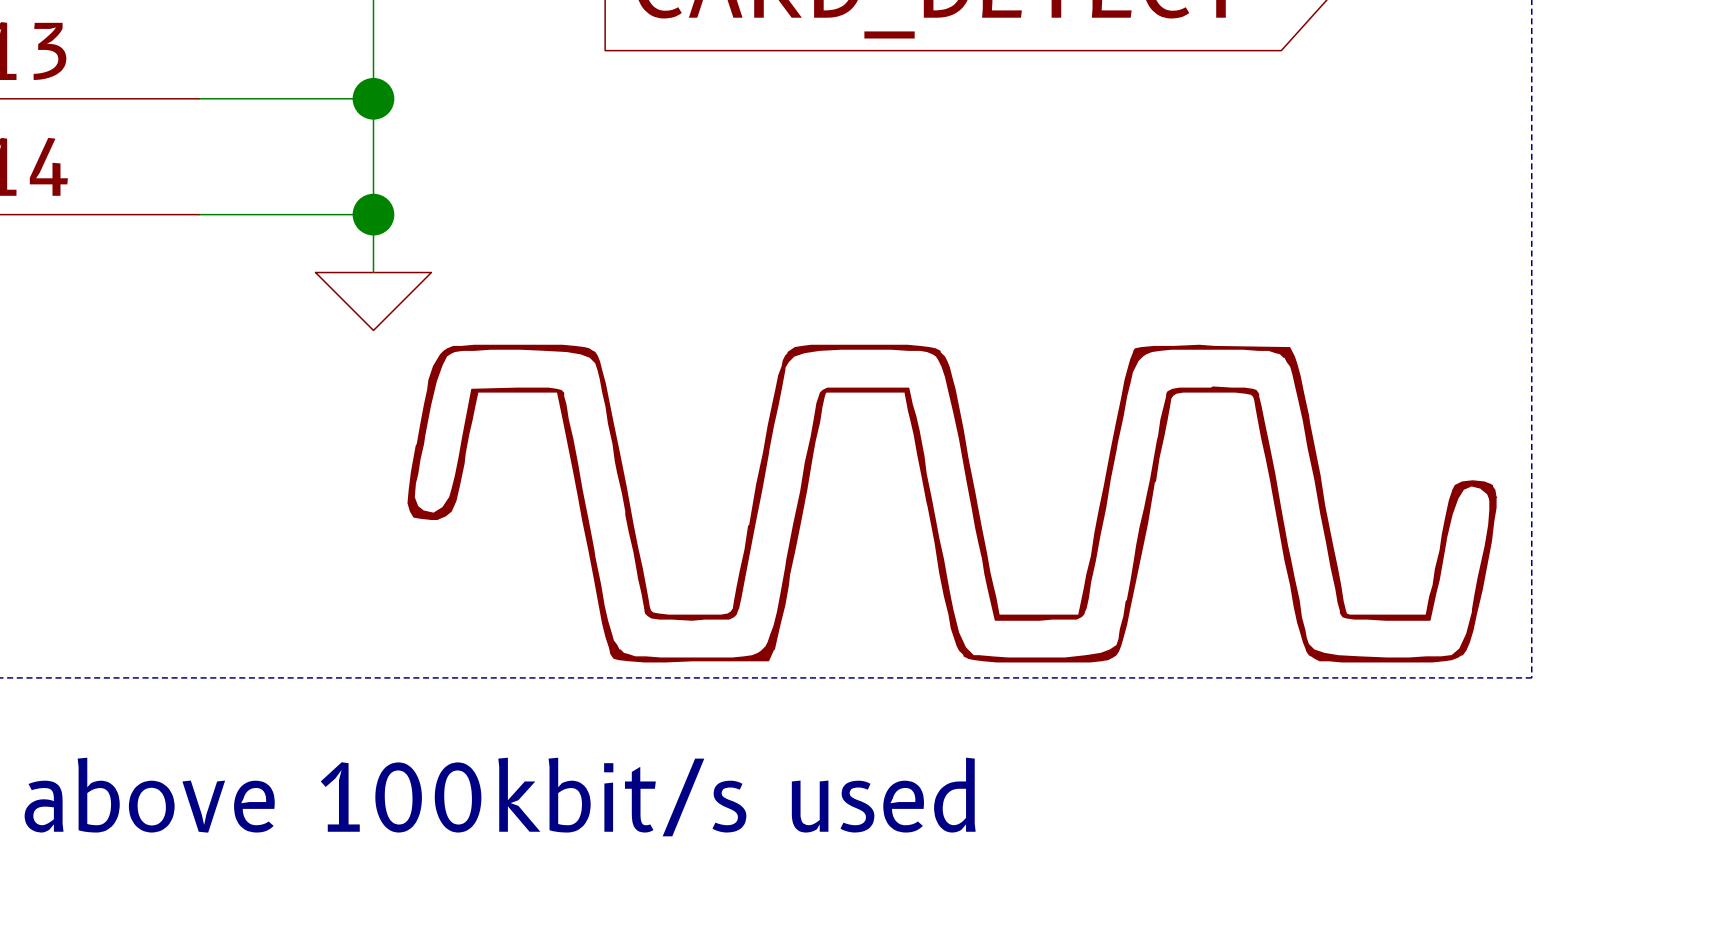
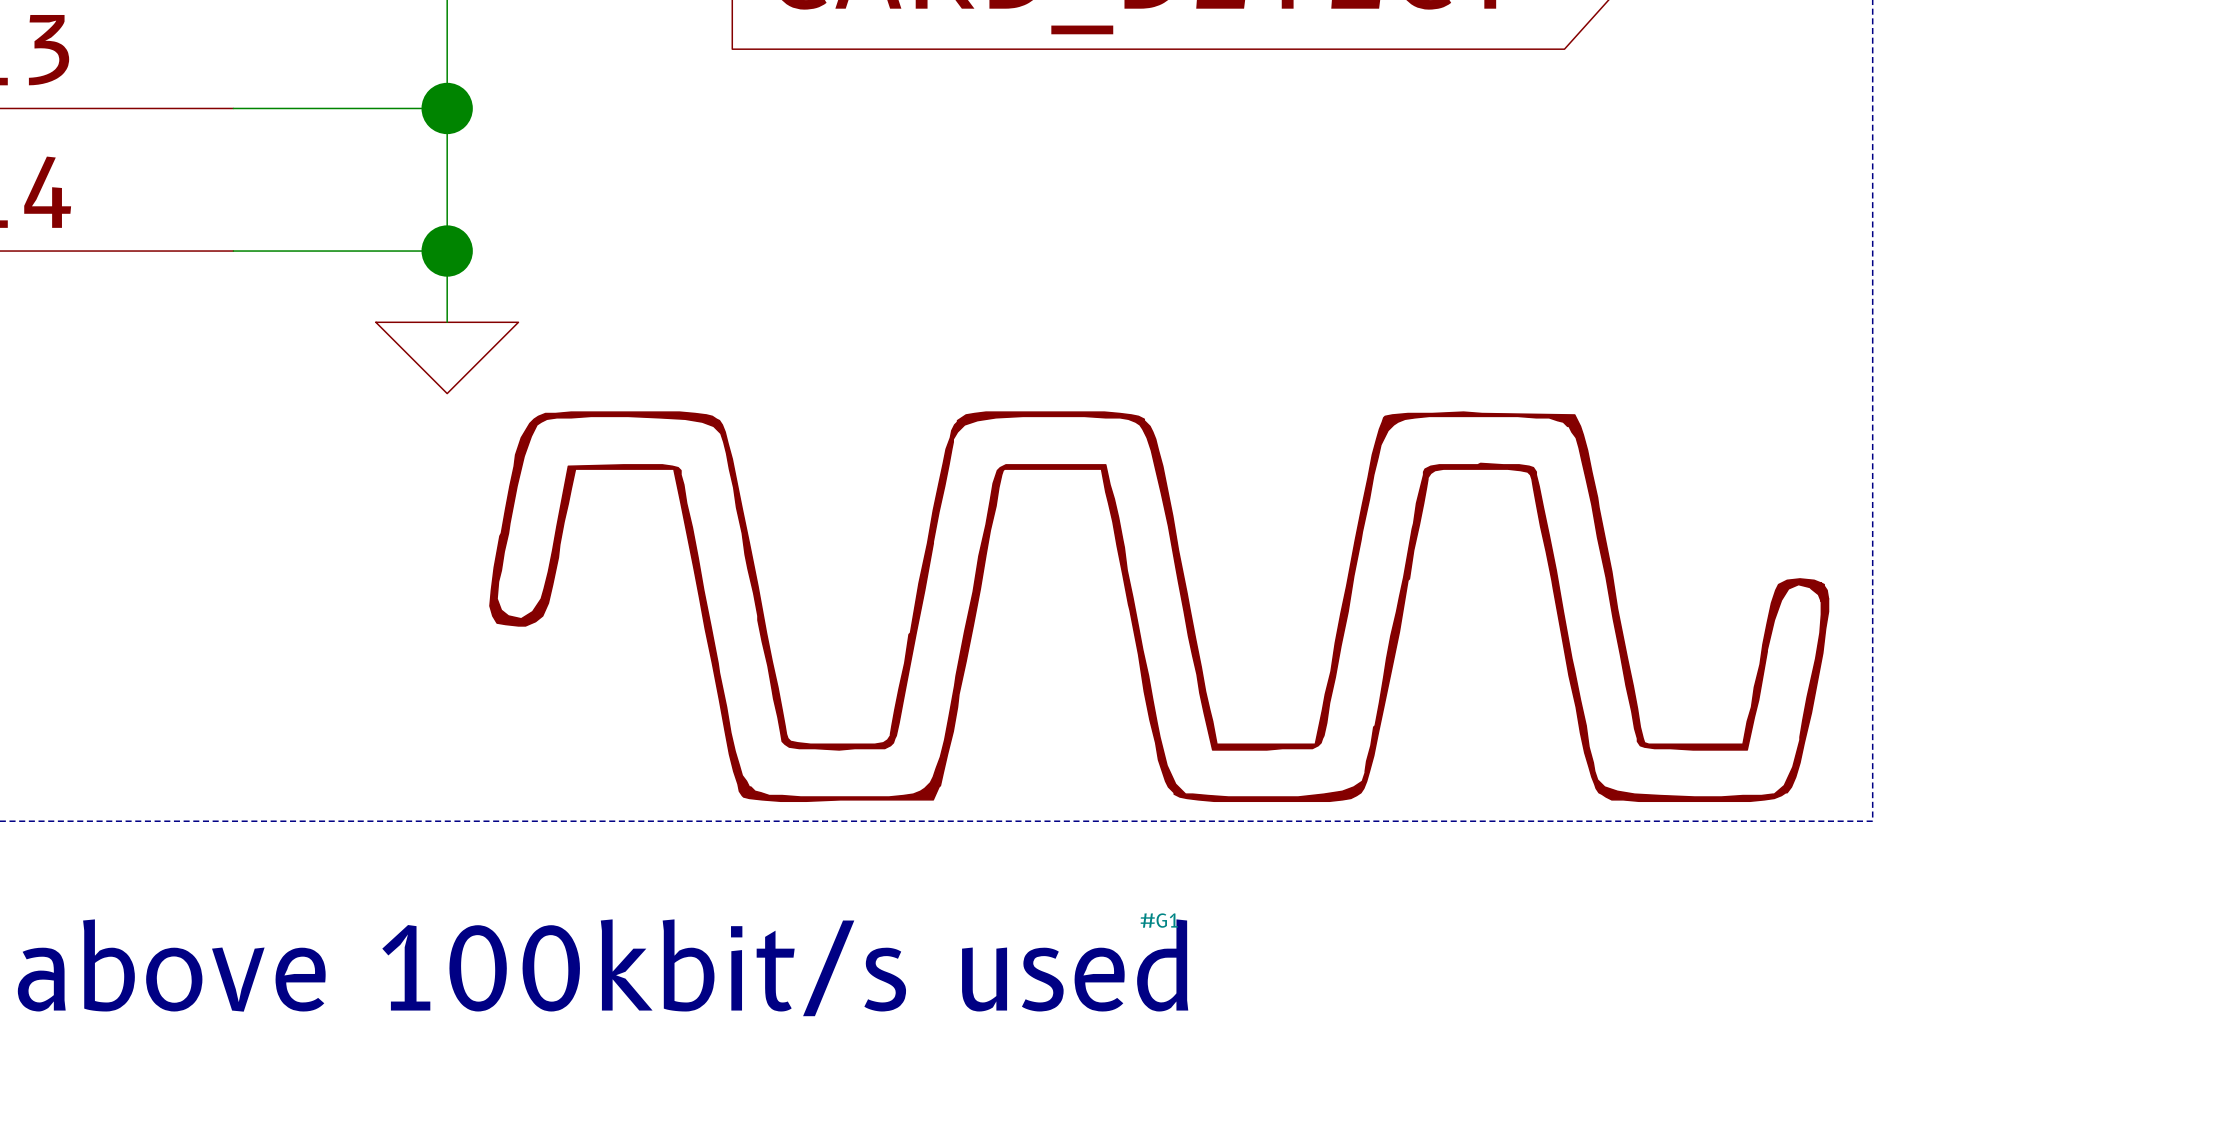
#G1 name: none -> #G1 (1159, 920)

